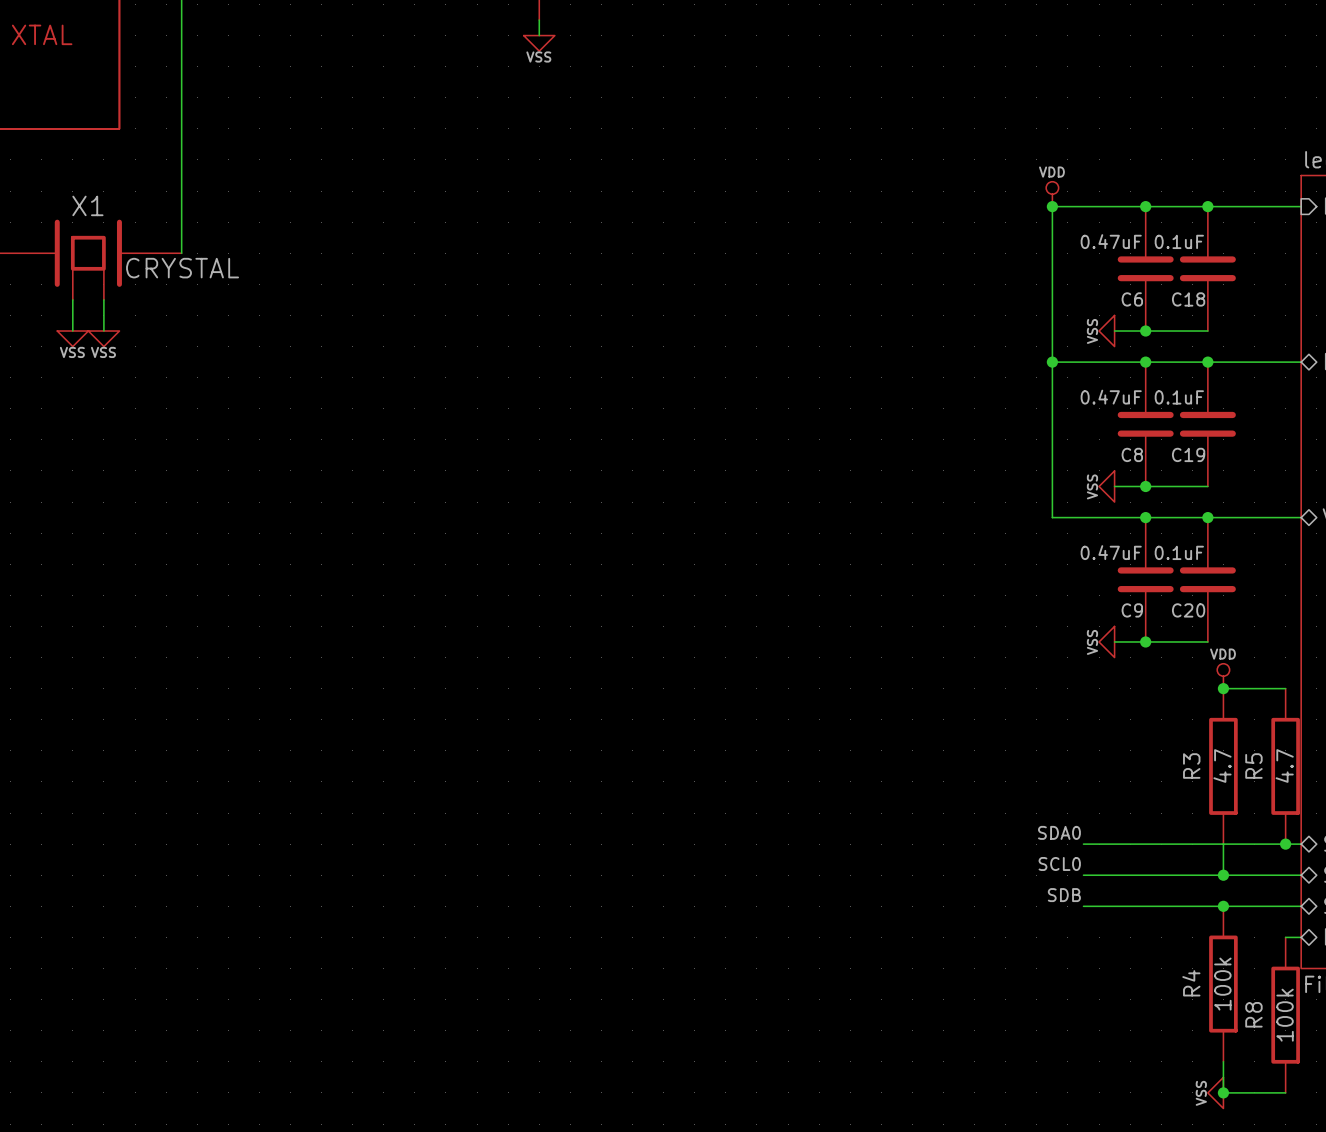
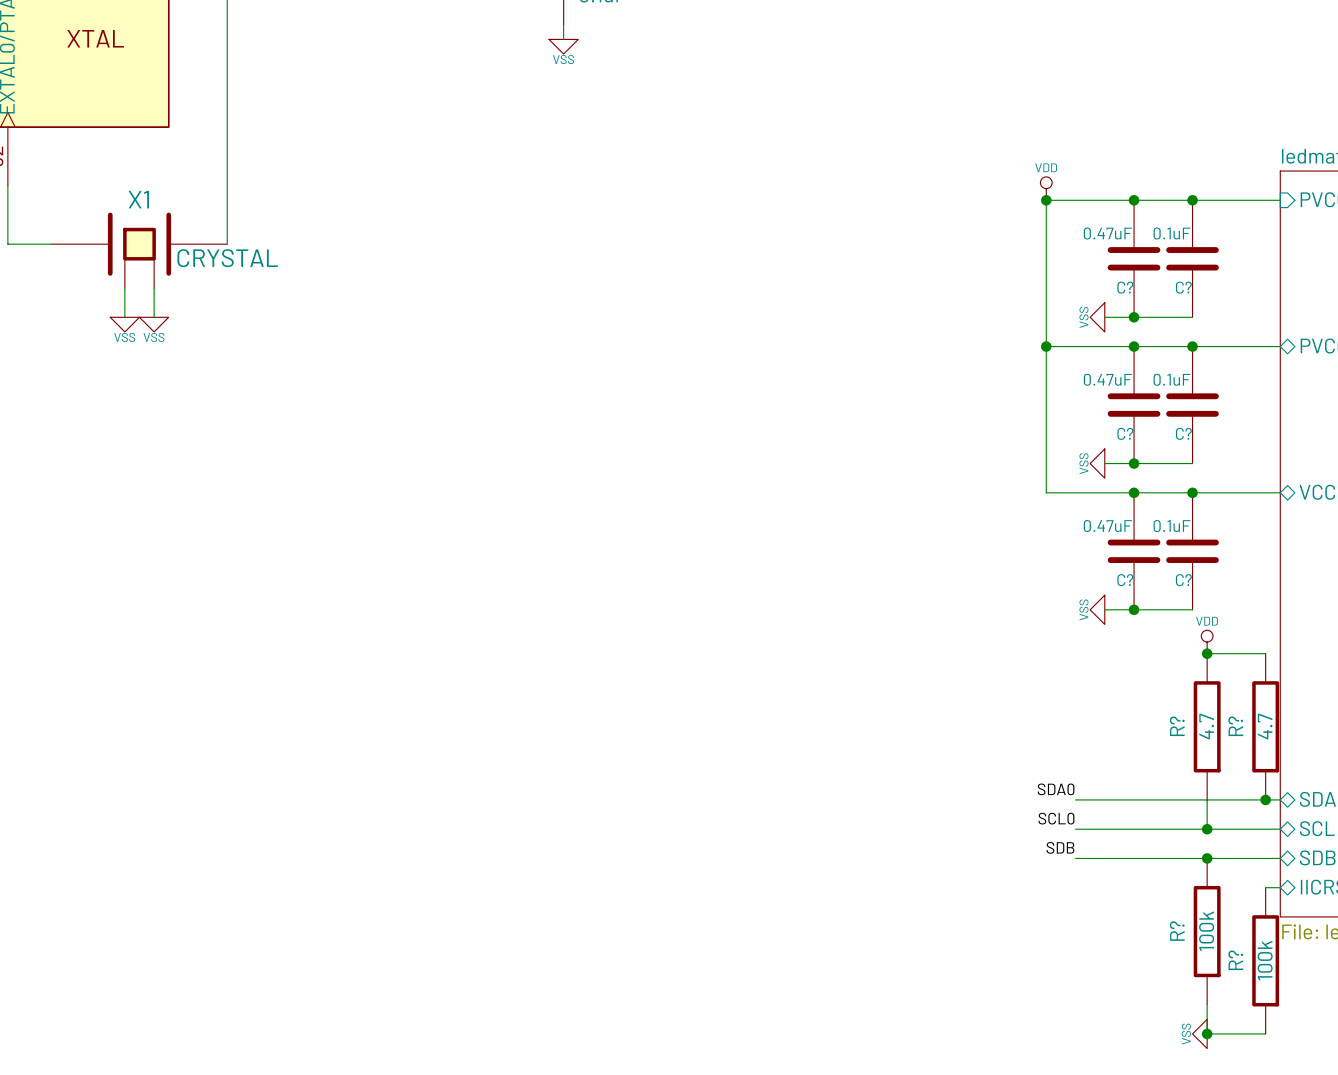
C6 name: C6 (1132, 299) -> C? (1125, 287)
C18 name: C18 (1188, 299) -> C? (1183, 287)
C8 name: C8 (1132, 454) -> C? (1125, 433)
C19 name: C19 (1188, 454) -> C? (1183, 433)
C9 name: C9 (1132, 610) -> C? (1125, 580)
C20 name: C20 (1188, 610) -> C? (1183, 580)
R3 name: R3 (1191, 766) -> R? (1177, 726)
R5 name: R5 (1253, 766) -> R? (1235, 726)
R4 name: R4 (1191, 983) -> R? (1177, 931)
R8 name: R8 (1253, 1014) -> R? (1235, 960)

